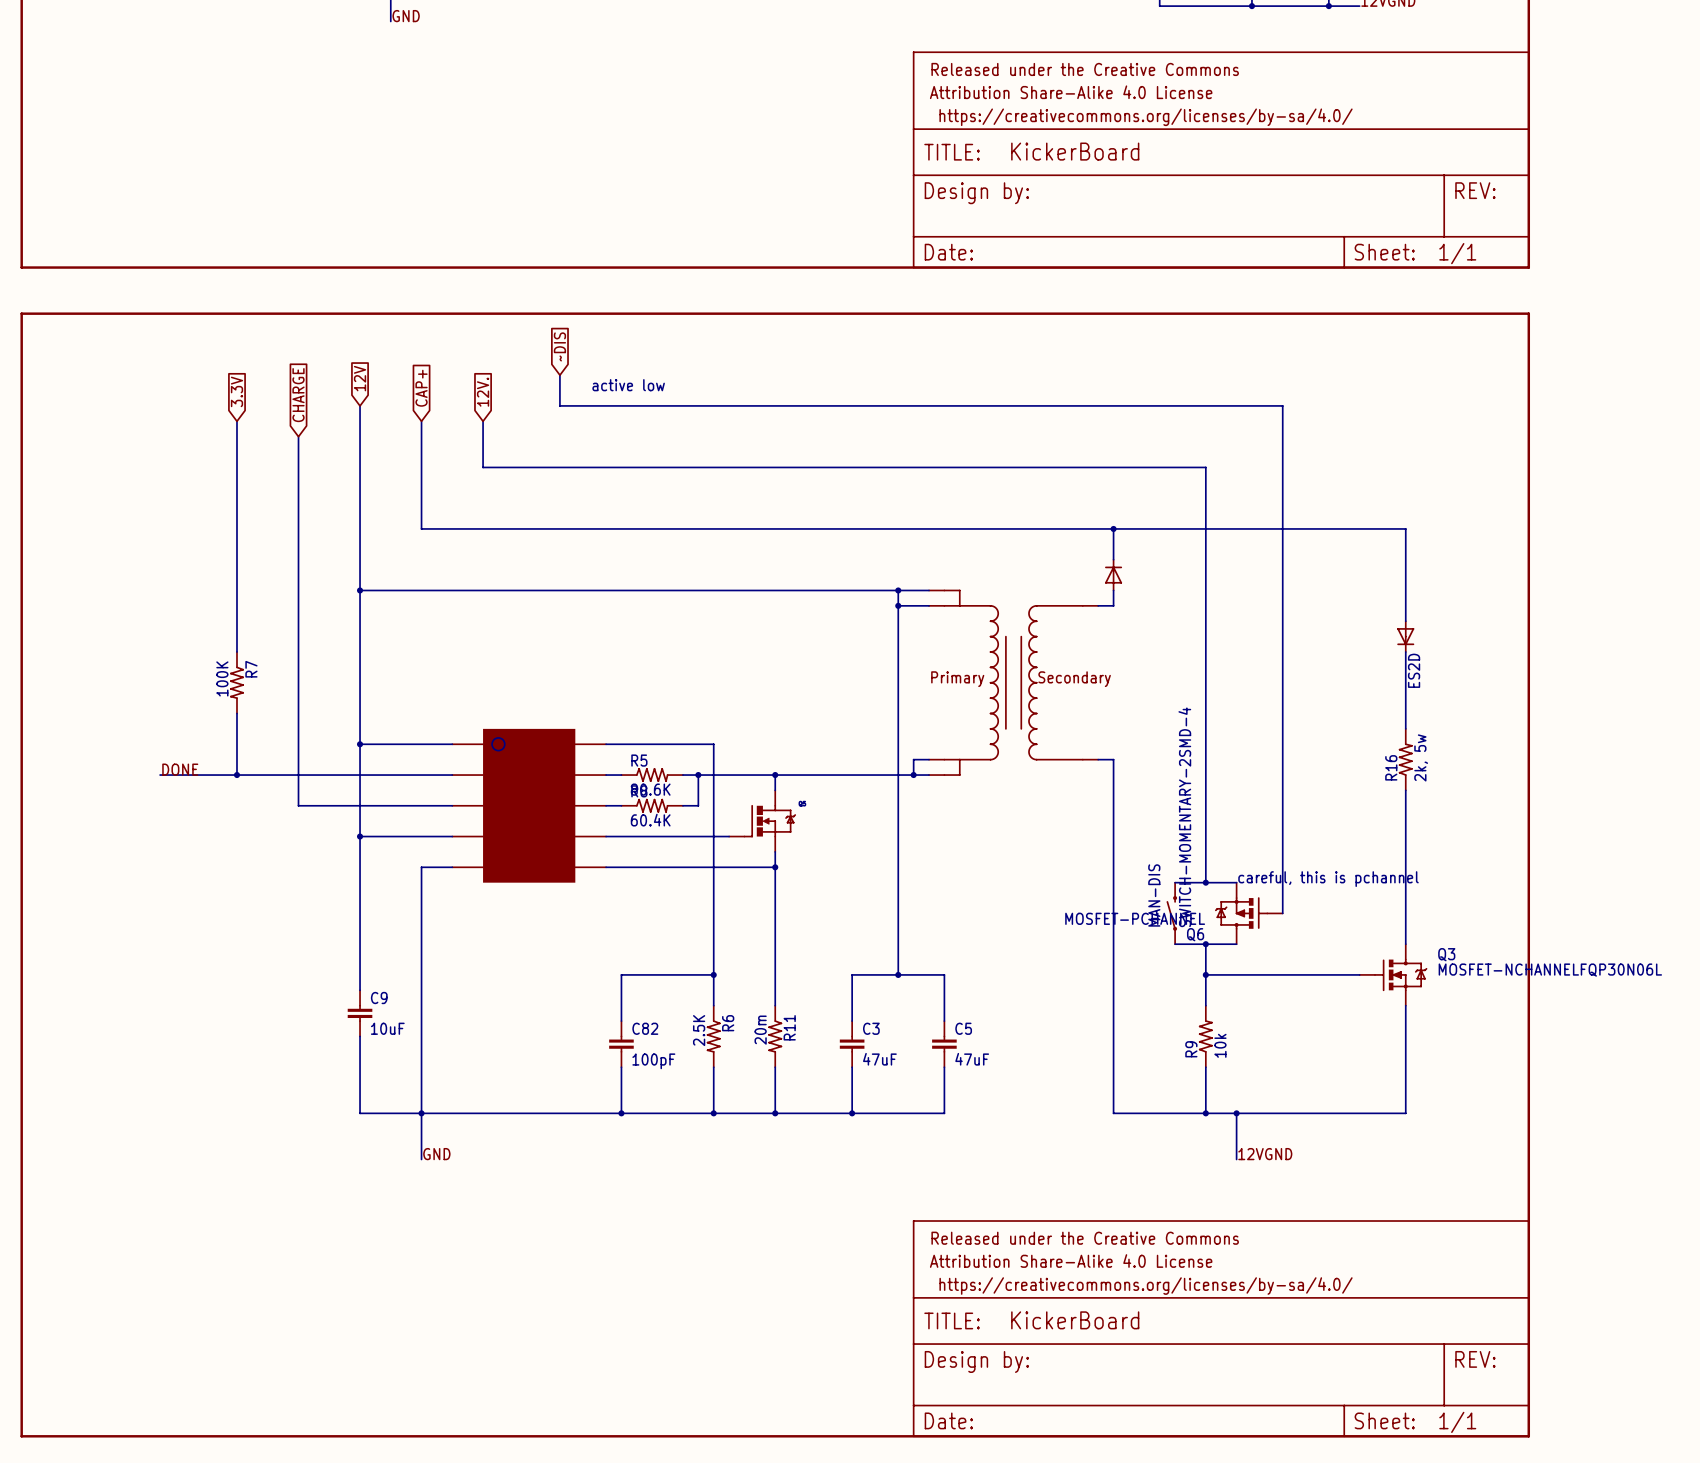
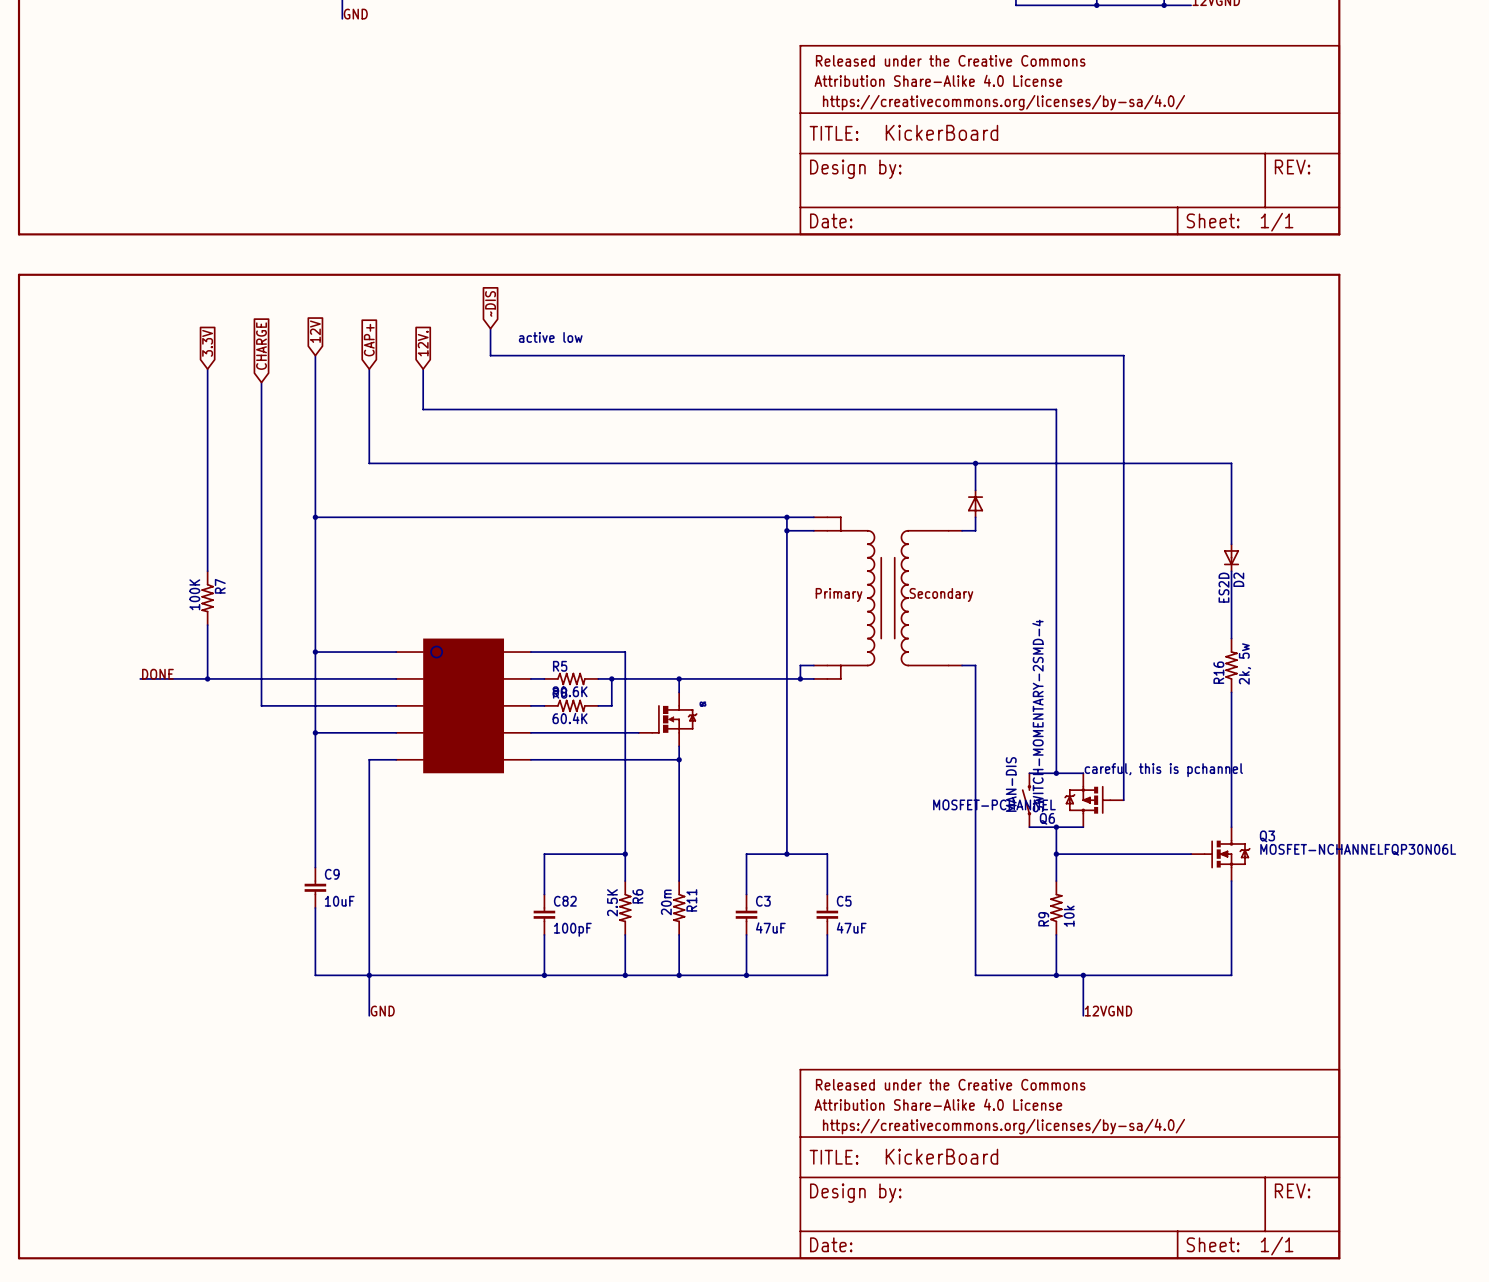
ES2D value: none -> ES2D (1223, 587)
ES2D name: ES2D (1414, 670) -> D2 (1238, 579)

